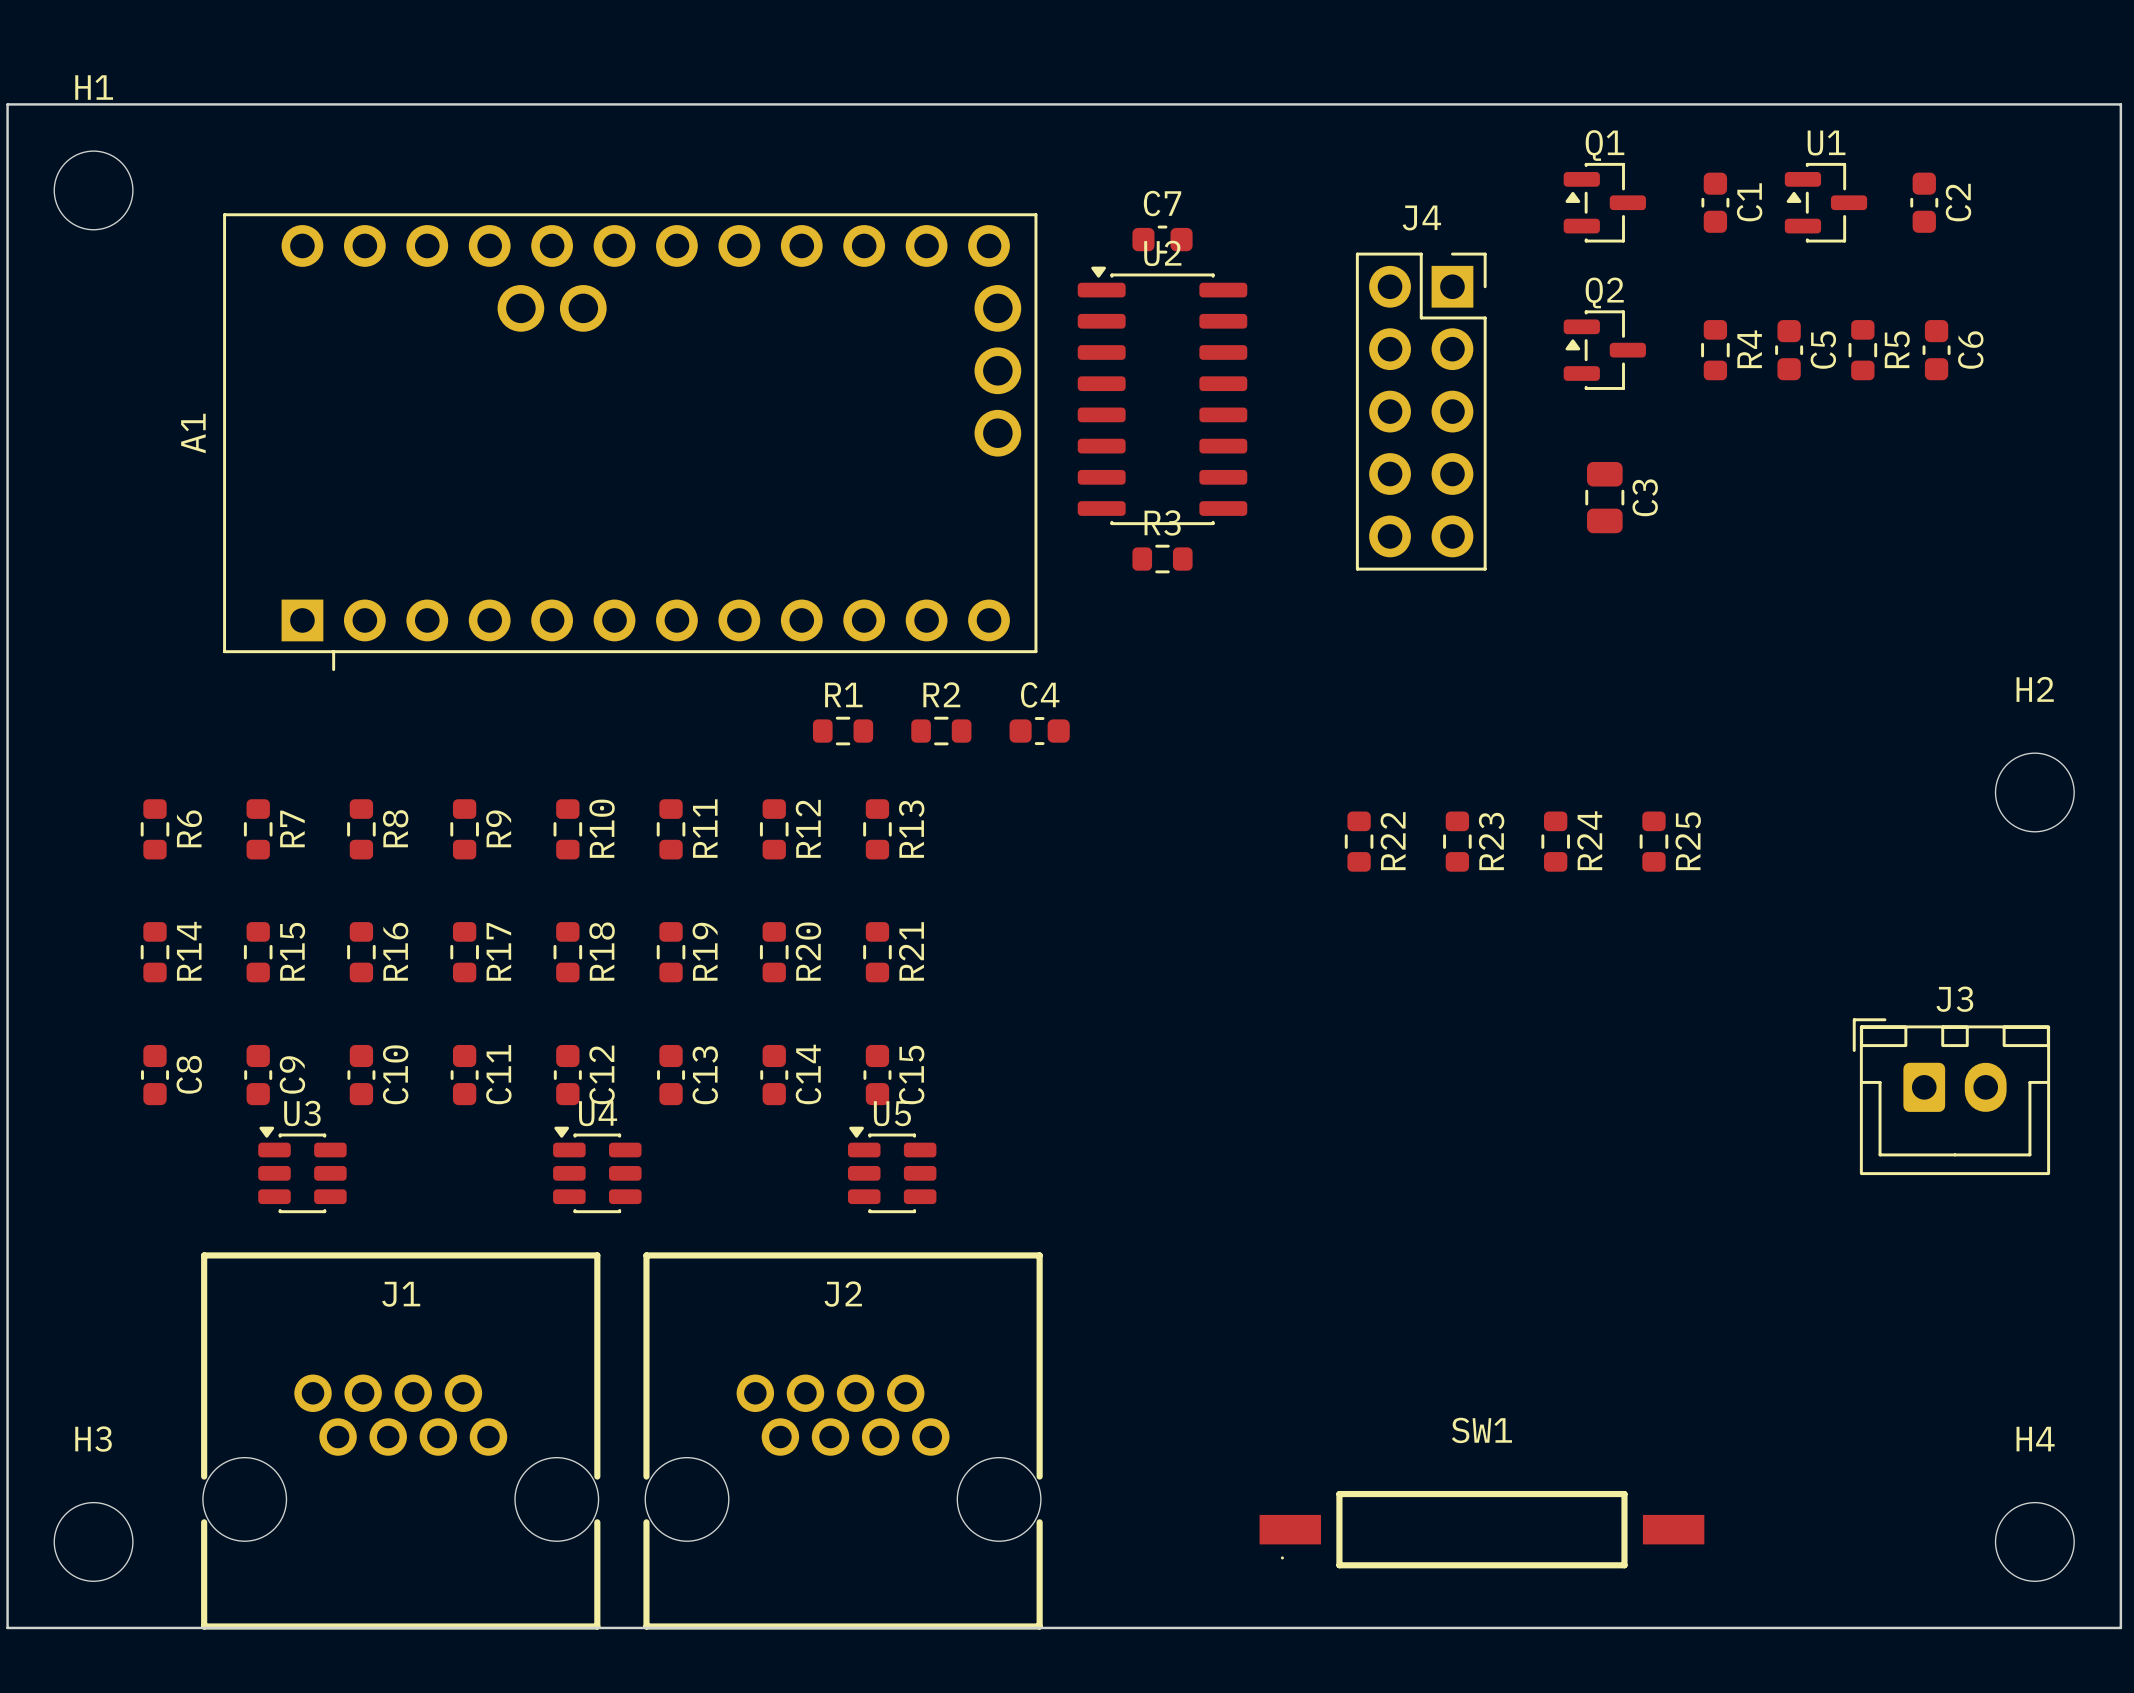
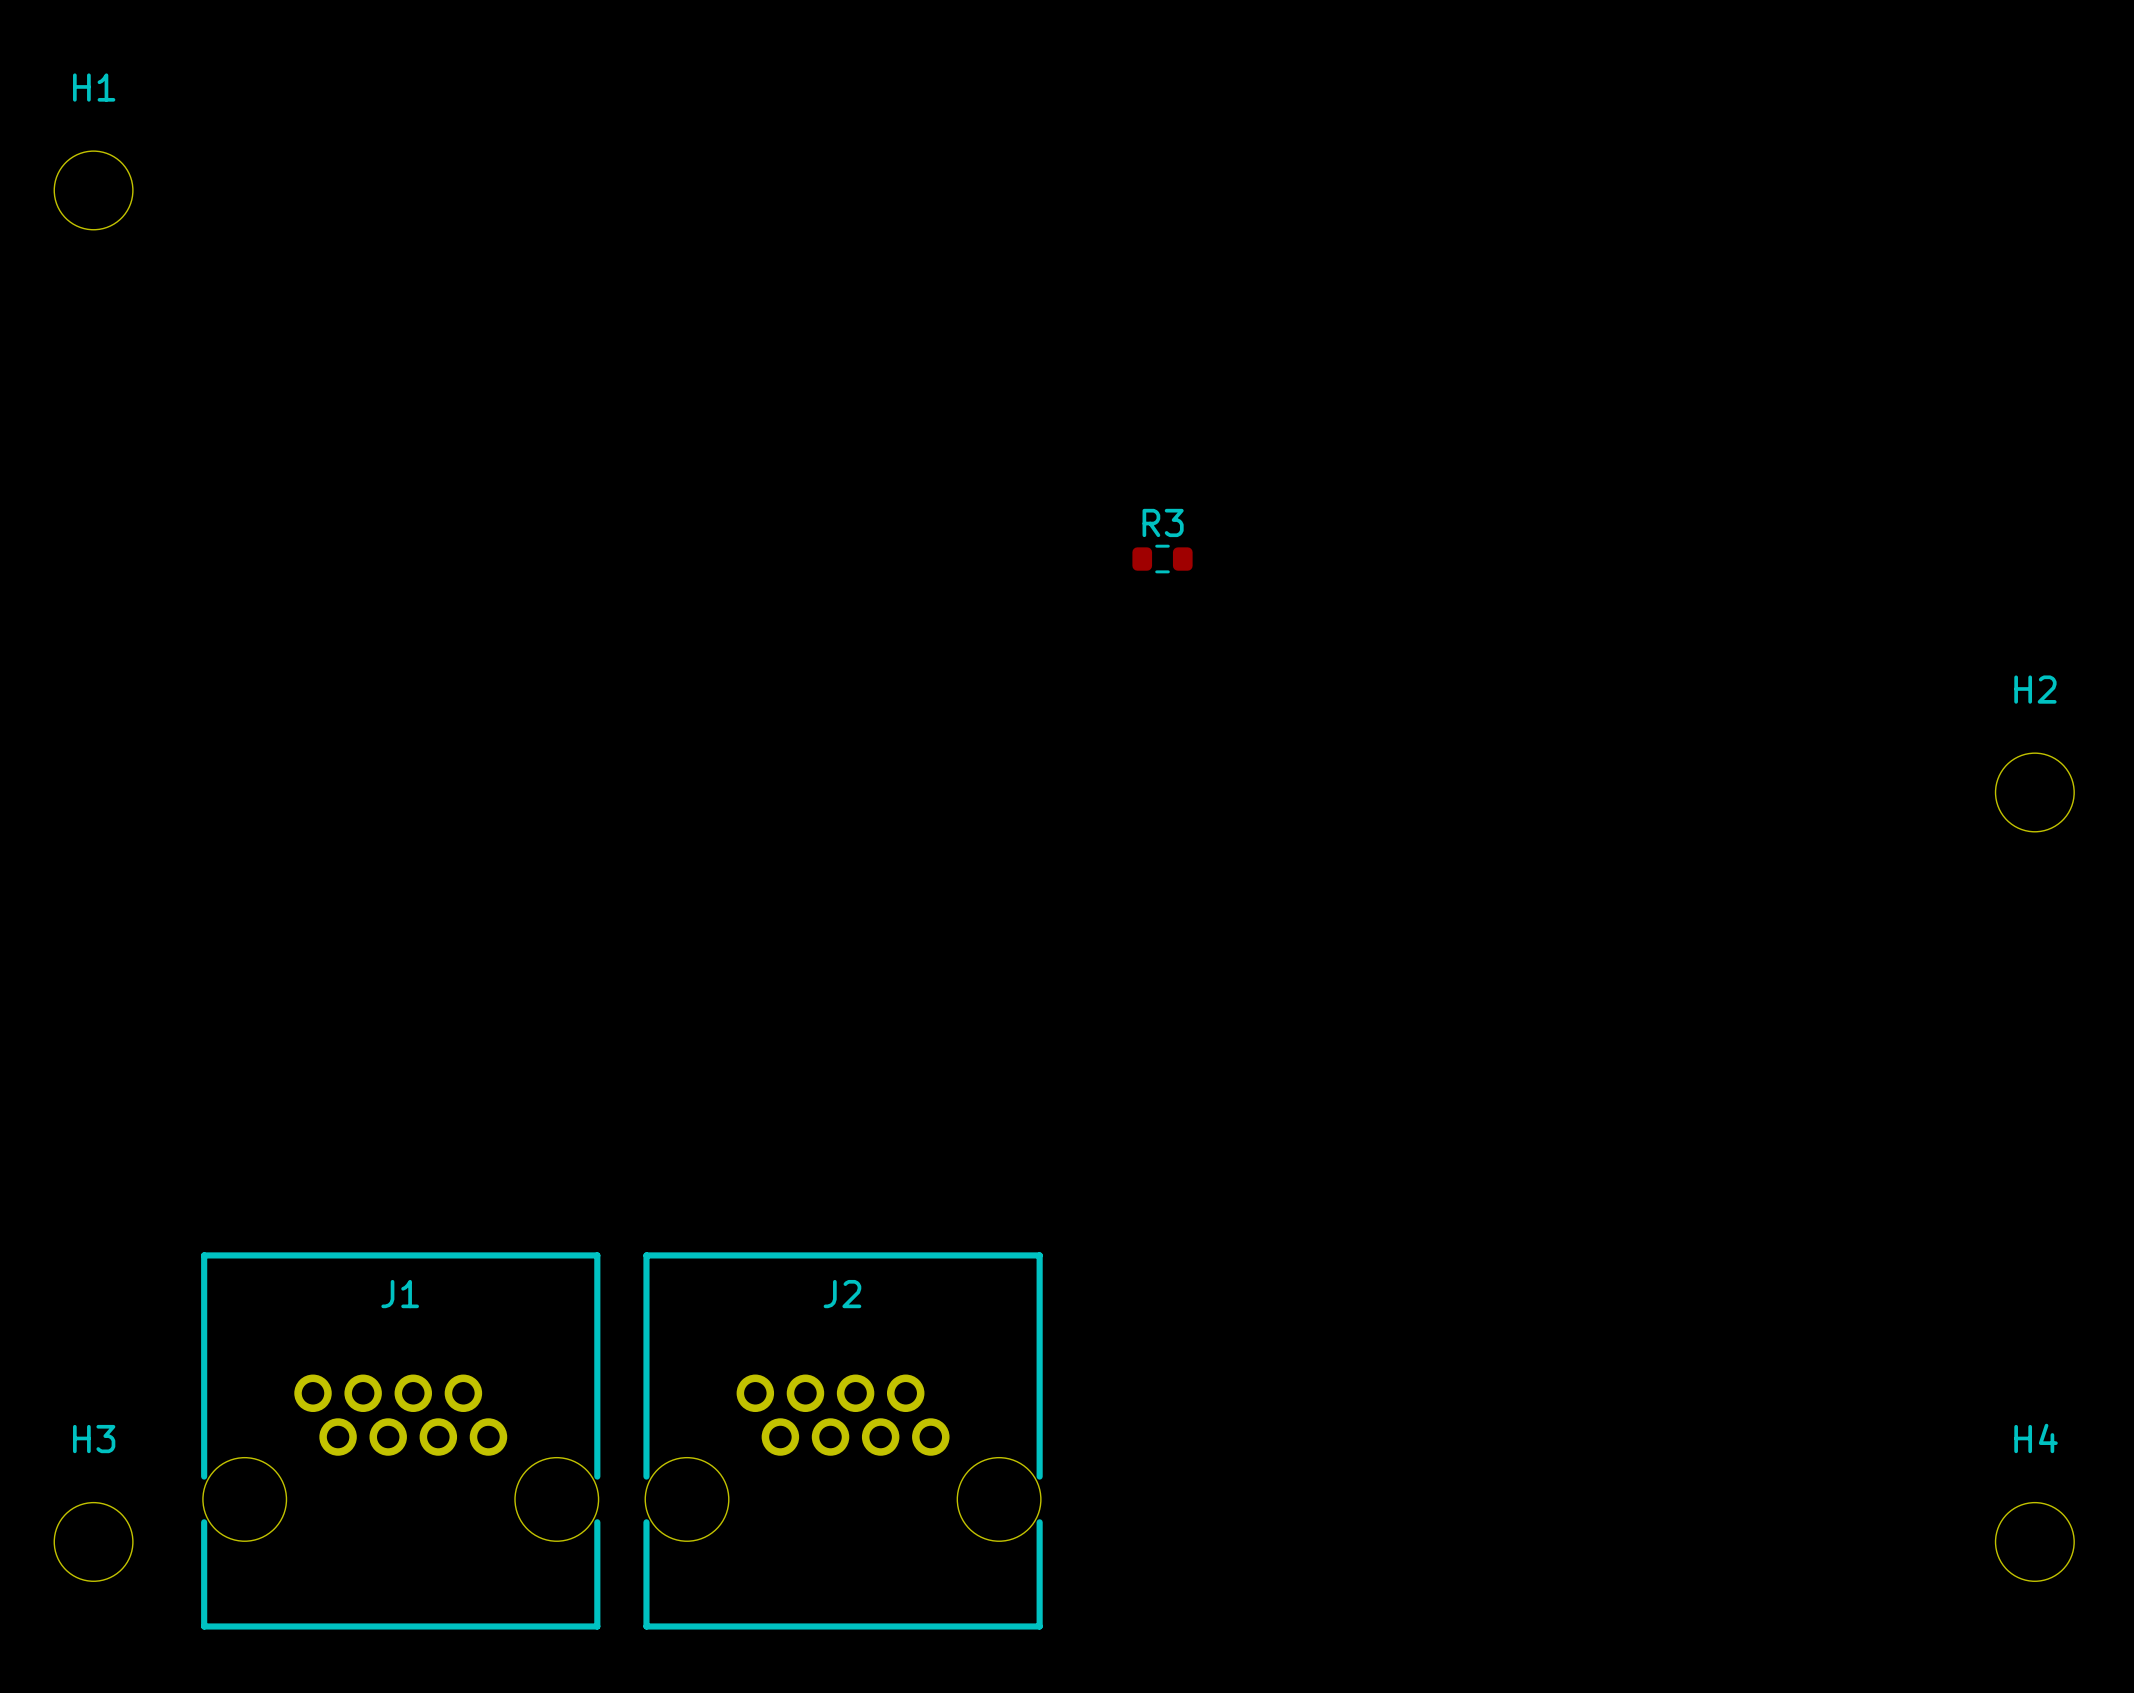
board edge: (7, 104) (2120, 104) (2120, 1627) (7, 1627) (7, 104) -> none
Q1: (1604, 202) -> none
C1: (1715, 202) -> none
U1: (1825, 202) -> none
C2: (1924, 202) -> none
C7: (1162, 239) -> none
Q2: (1604, 350) -> none
R4: (1715, 350) -> none
C5: (1789, 350) -> none
R5: (1862, 350) -> none
C6: (1936, 350) -> none
U2: (1162, 395) -> none
J4: (1421, 411) -> none
A1: (630, 442) -> none
C3: (1604, 497) -> none
R1: (843, 731) -> none
R2: (941, 731) -> none
C4: (1039, 731) -> none
R6: (155, 829) -> none
R7: (258, 829) -> none
R8: (361, 829) -> none
R9: (464, 829) -> none
R10: (567, 829) -> none
R11: (671, 829) -> none
R12: (774, 829) -> none
R13: (877, 829) -> none
R22: (1359, 841) -> none
R23: (1457, 841) -> none
R24: (1555, 841) -> none
R25: (1653, 841) -> none
R14: (155, 952) -> none
R15: (258, 952) -> none
R16: (361, 952) -> none
R17: (464, 952) -> none
R18: (567, 952) -> none
R19: (671, 952) -> none
R20: (774, 952) -> none
R21: (877, 952) -> none
C8: (155, 1075) -> none
C9: (258, 1075) -> none
C10: (361, 1075) -> none
C11: (464, 1075) -> none
C12: (567, 1075) -> none
C13: (671, 1075) -> none
C14: (774, 1075) -> none
C15: (877, 1075) -> none
J3: (1951, 1096) -> none
U3: (302, 1169) -> none
U4: (597, 1169) -> none
U5: (892, 1169) -> none
SW1: (1481, 1529) -> none

